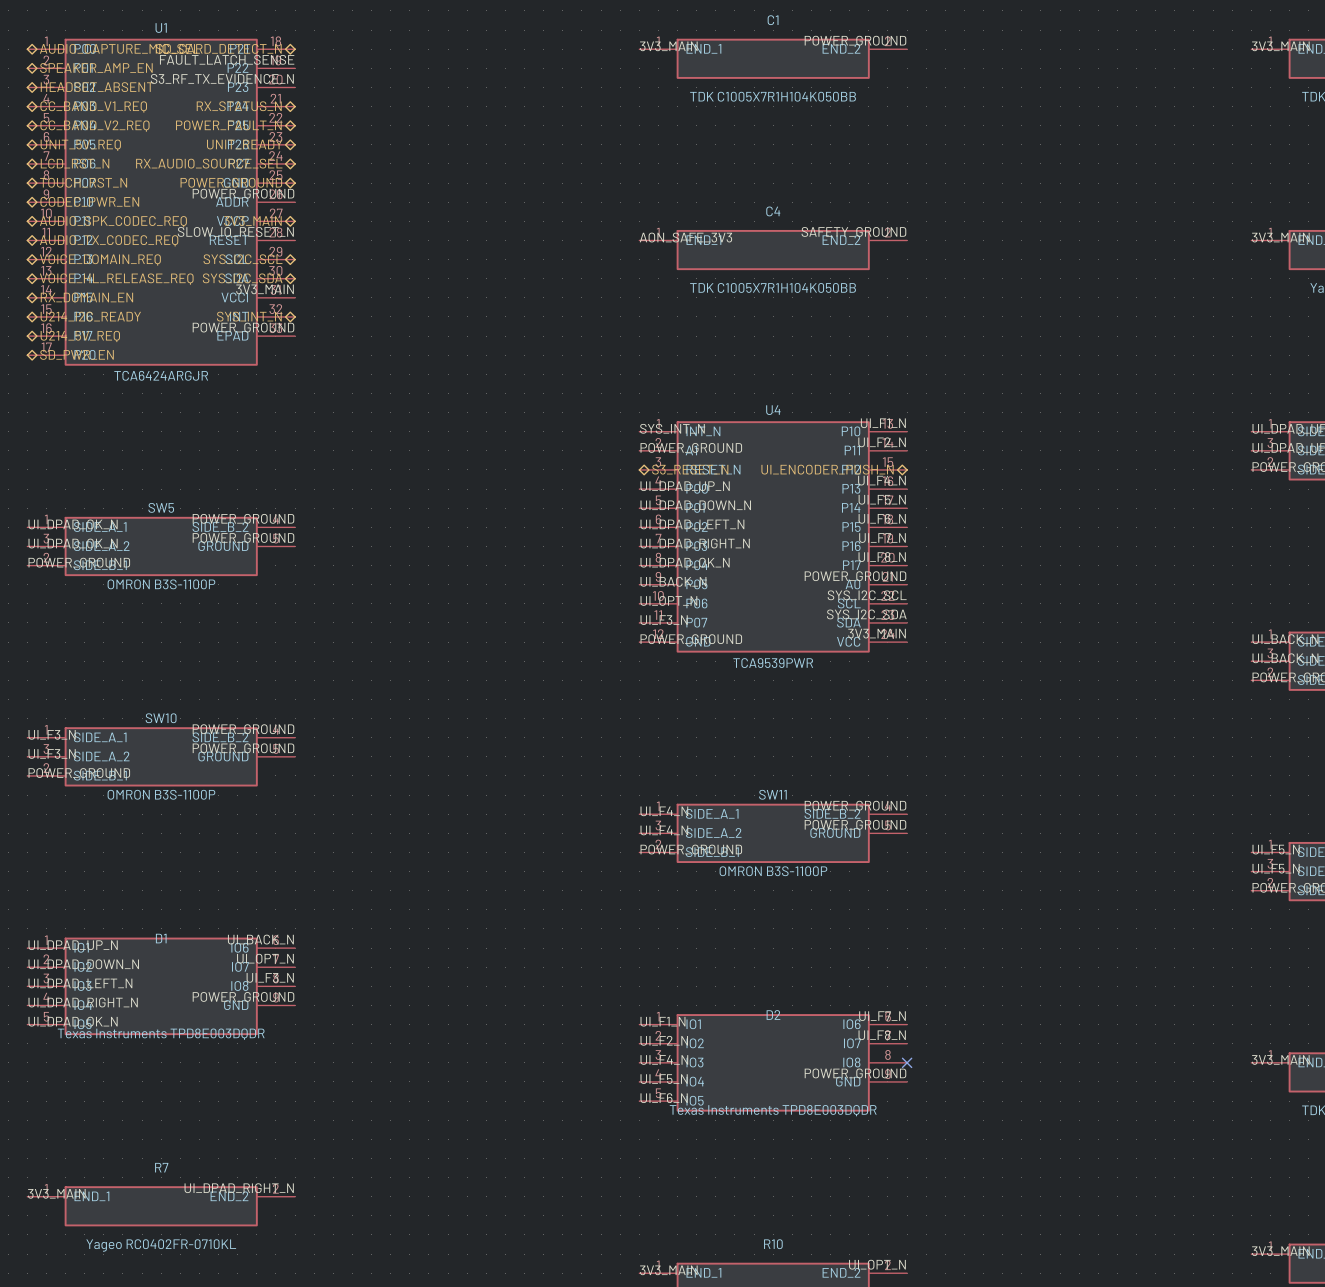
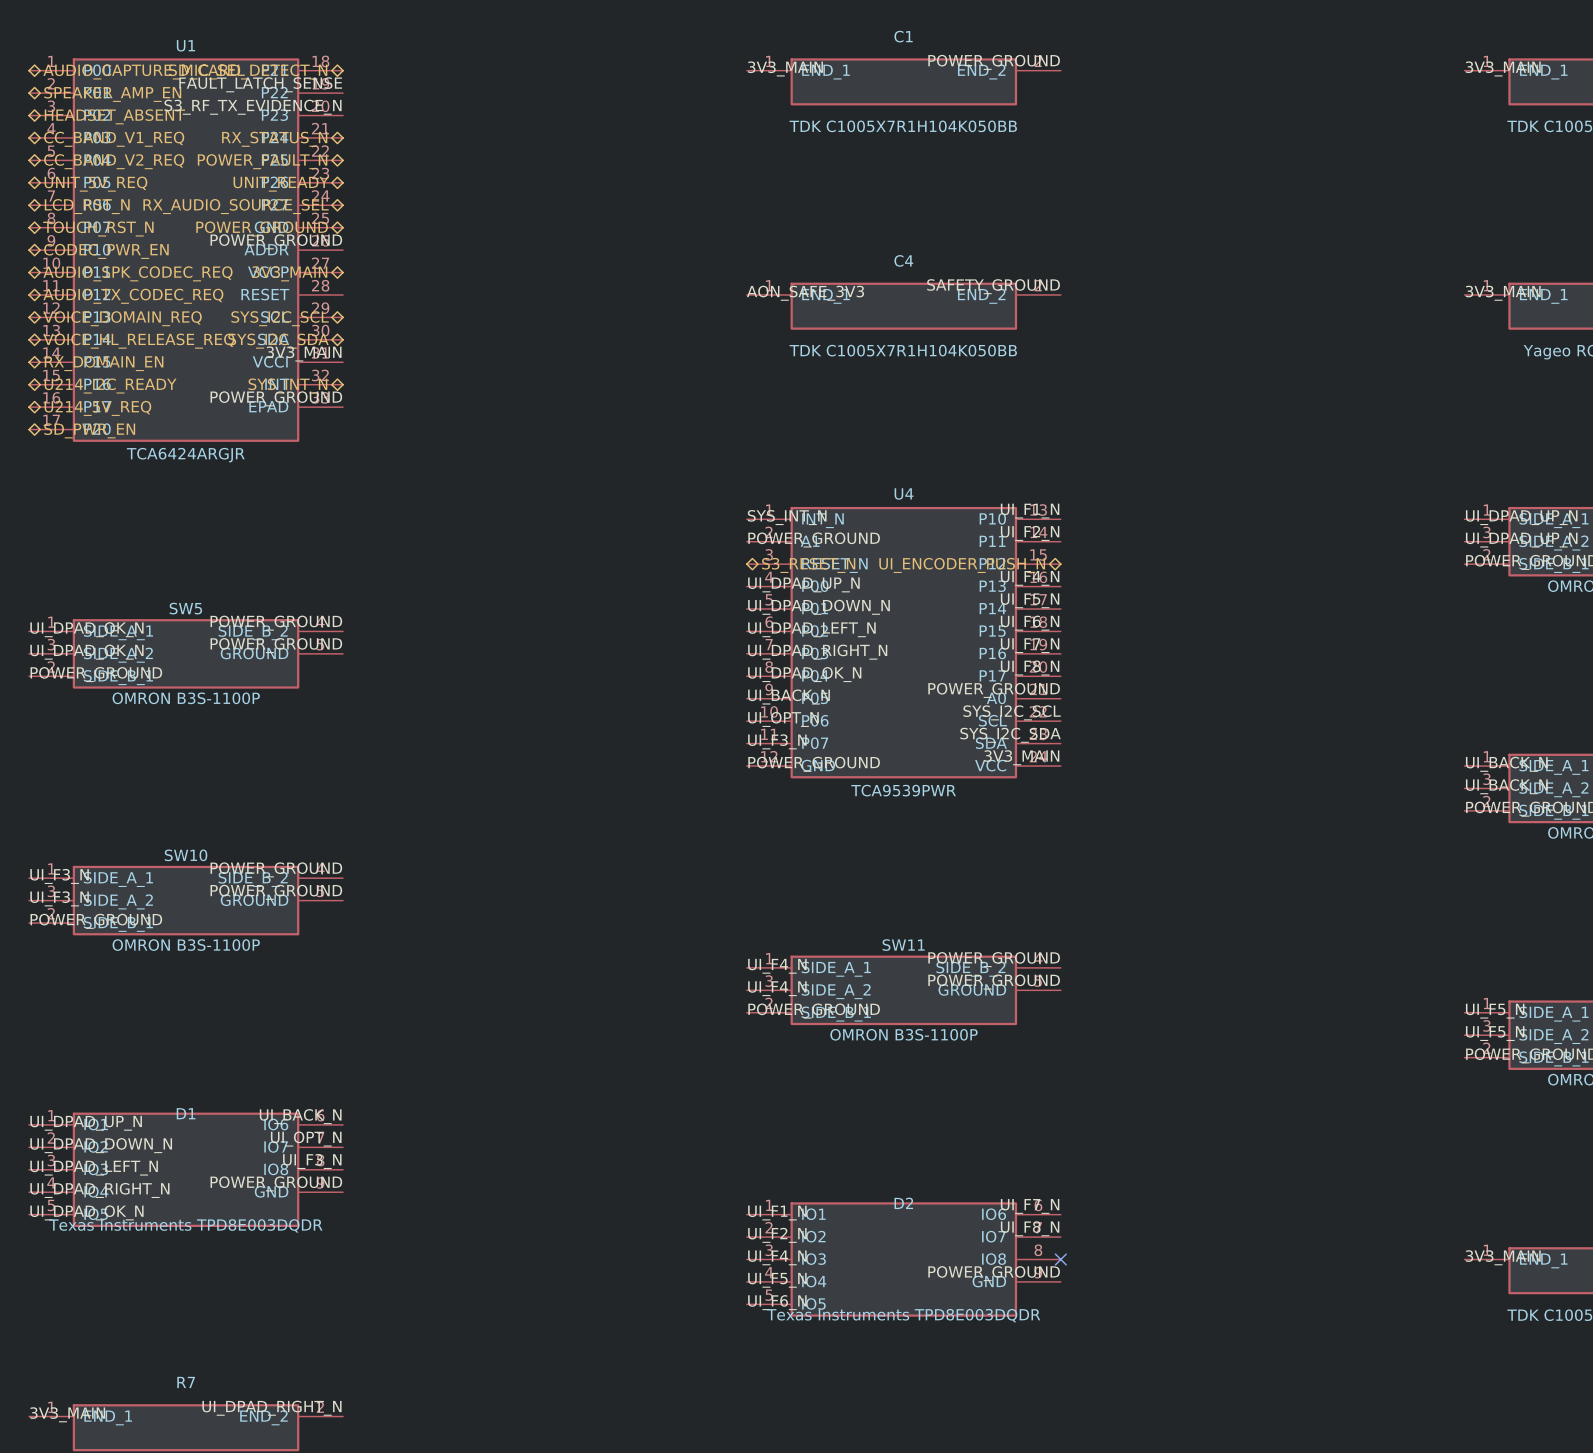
label: SLOW_IO_RESET_N (235, 231) -> none

